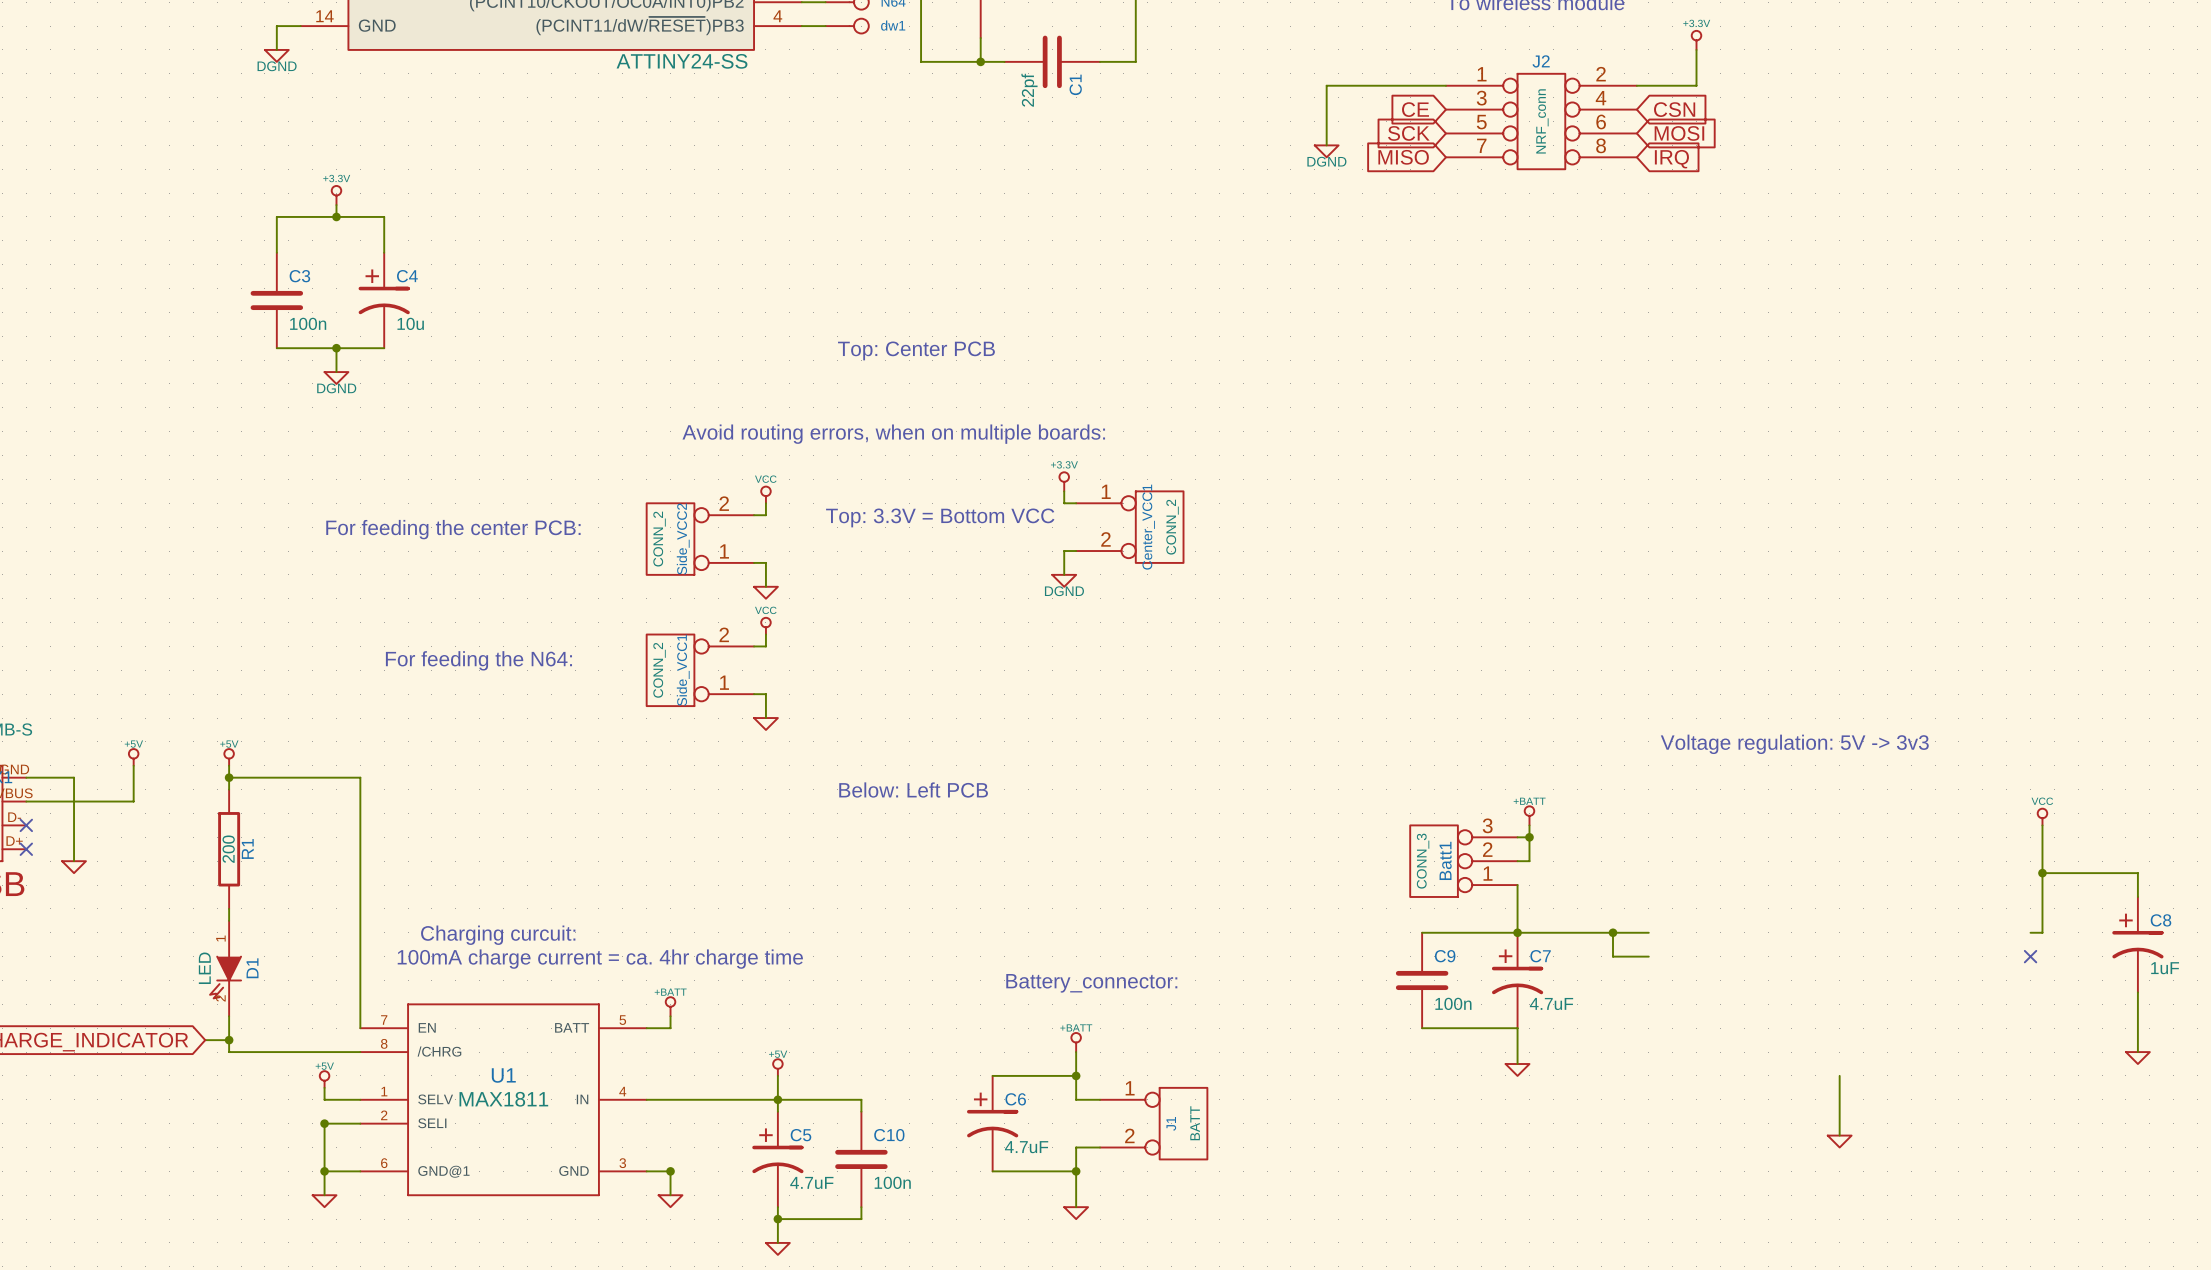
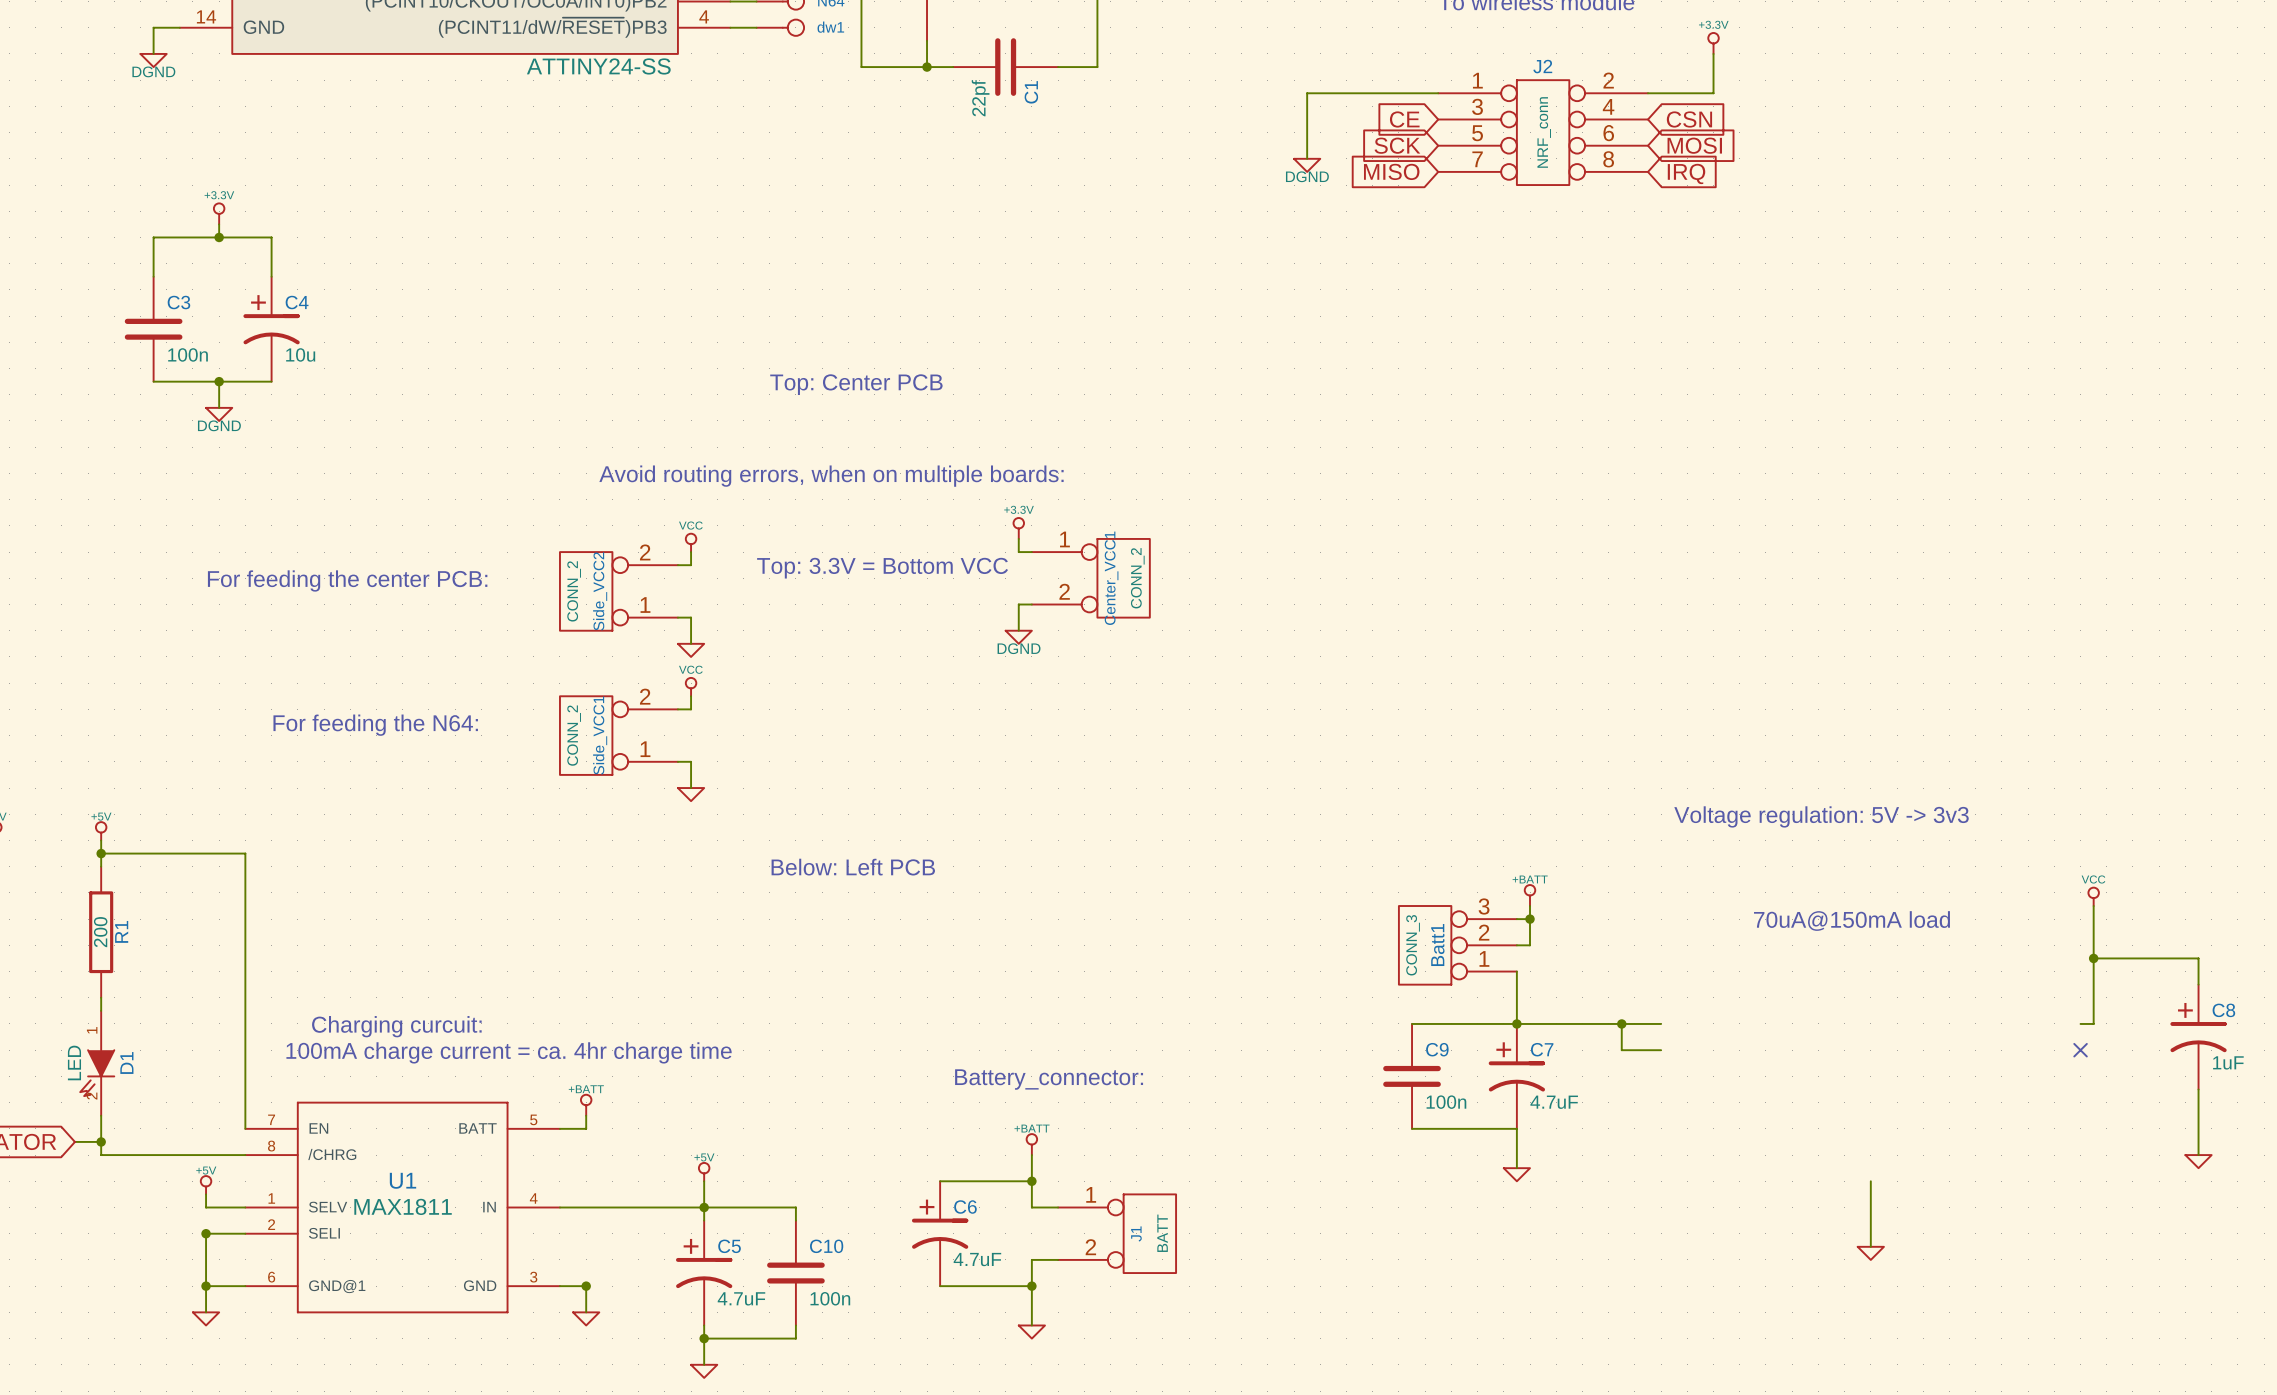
text: none -> 70uA@150mA load (1852, 921)

